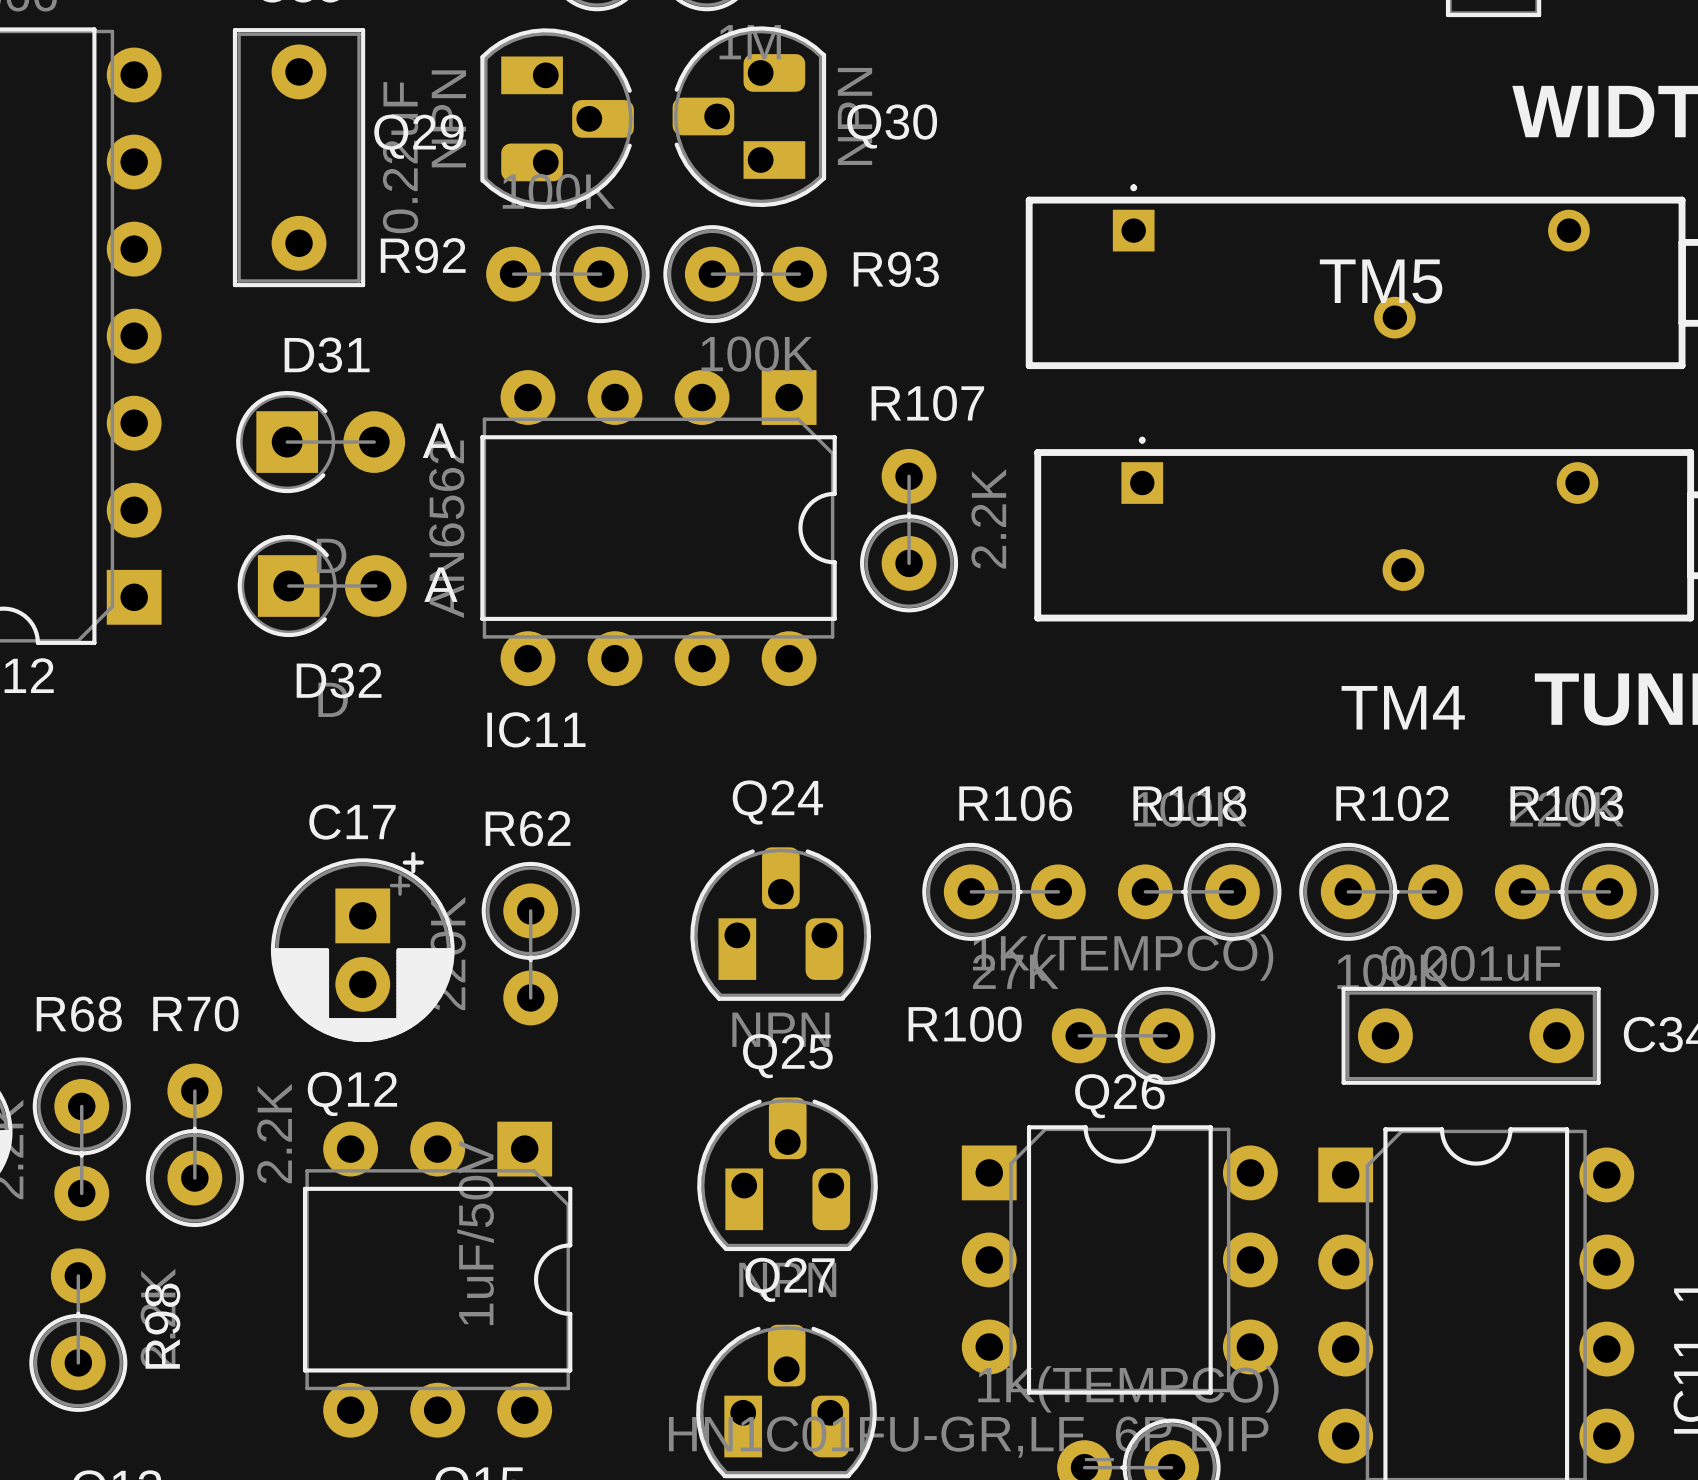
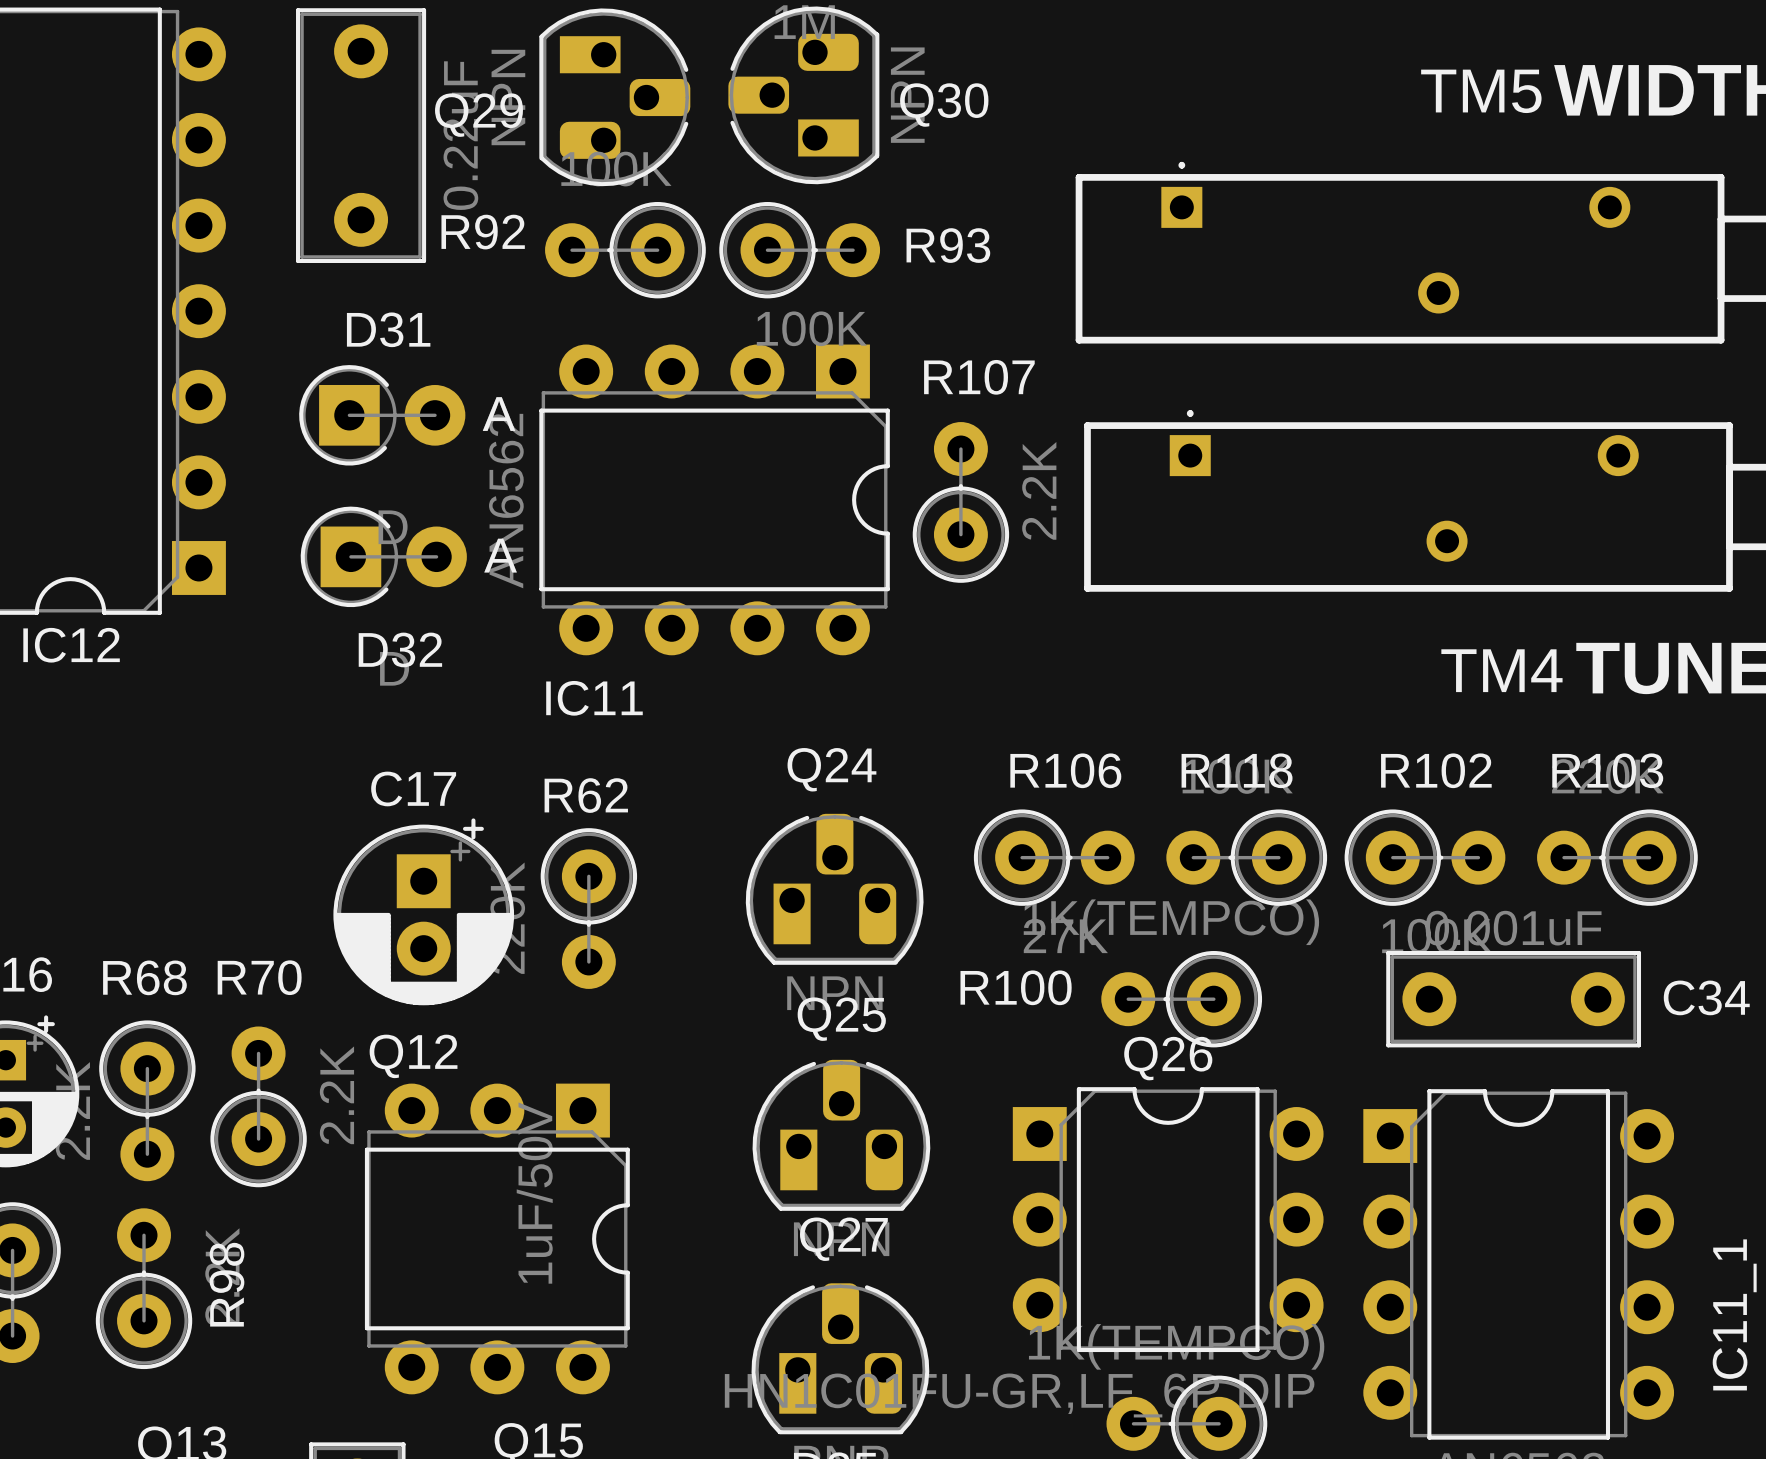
TM5 name position: TM5 (1381, 281) -> TM5 (1481, 91)
TM4 name position: TM4 (1403, 707) -> TM4 (1501, 670)

